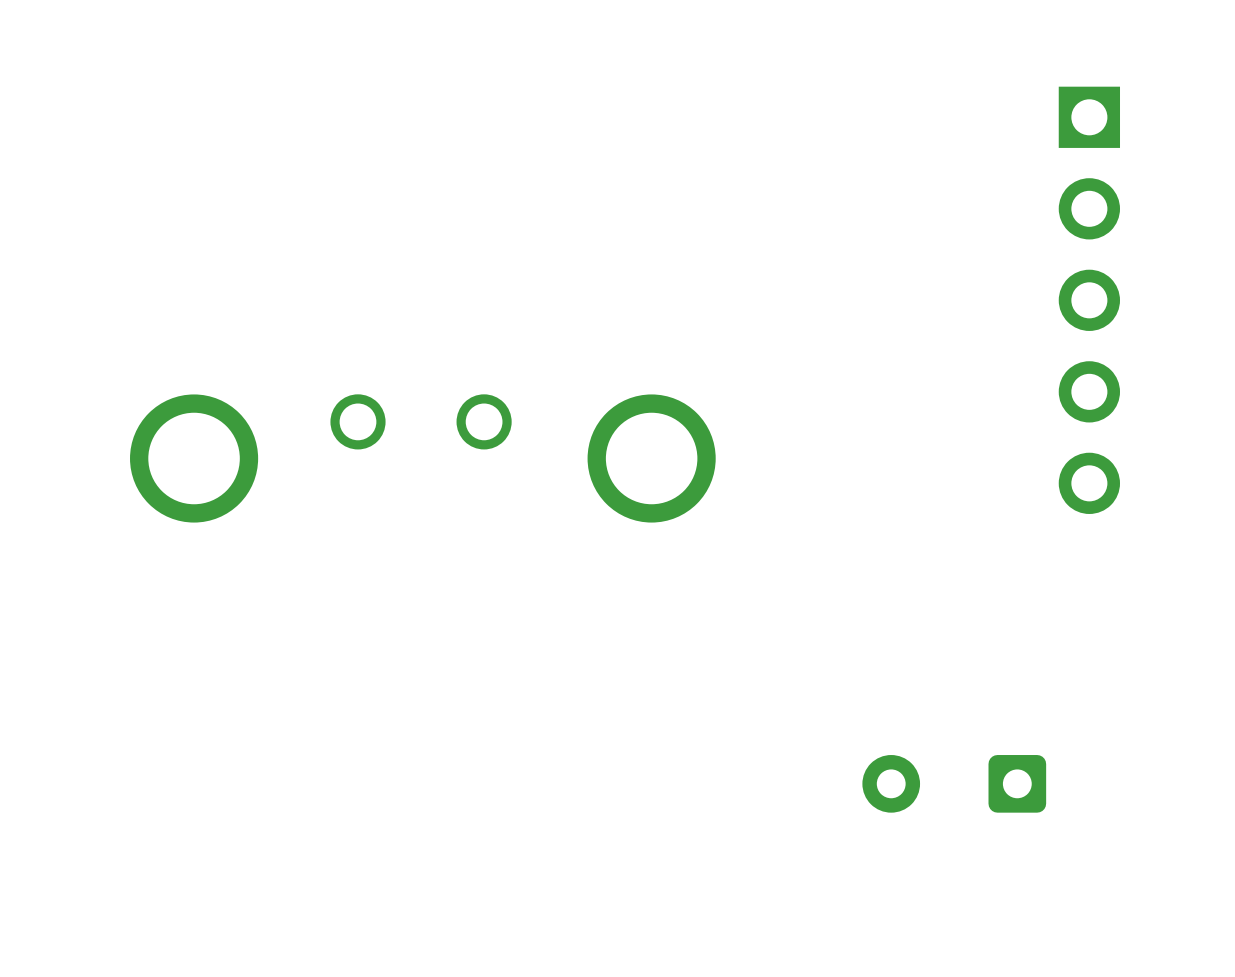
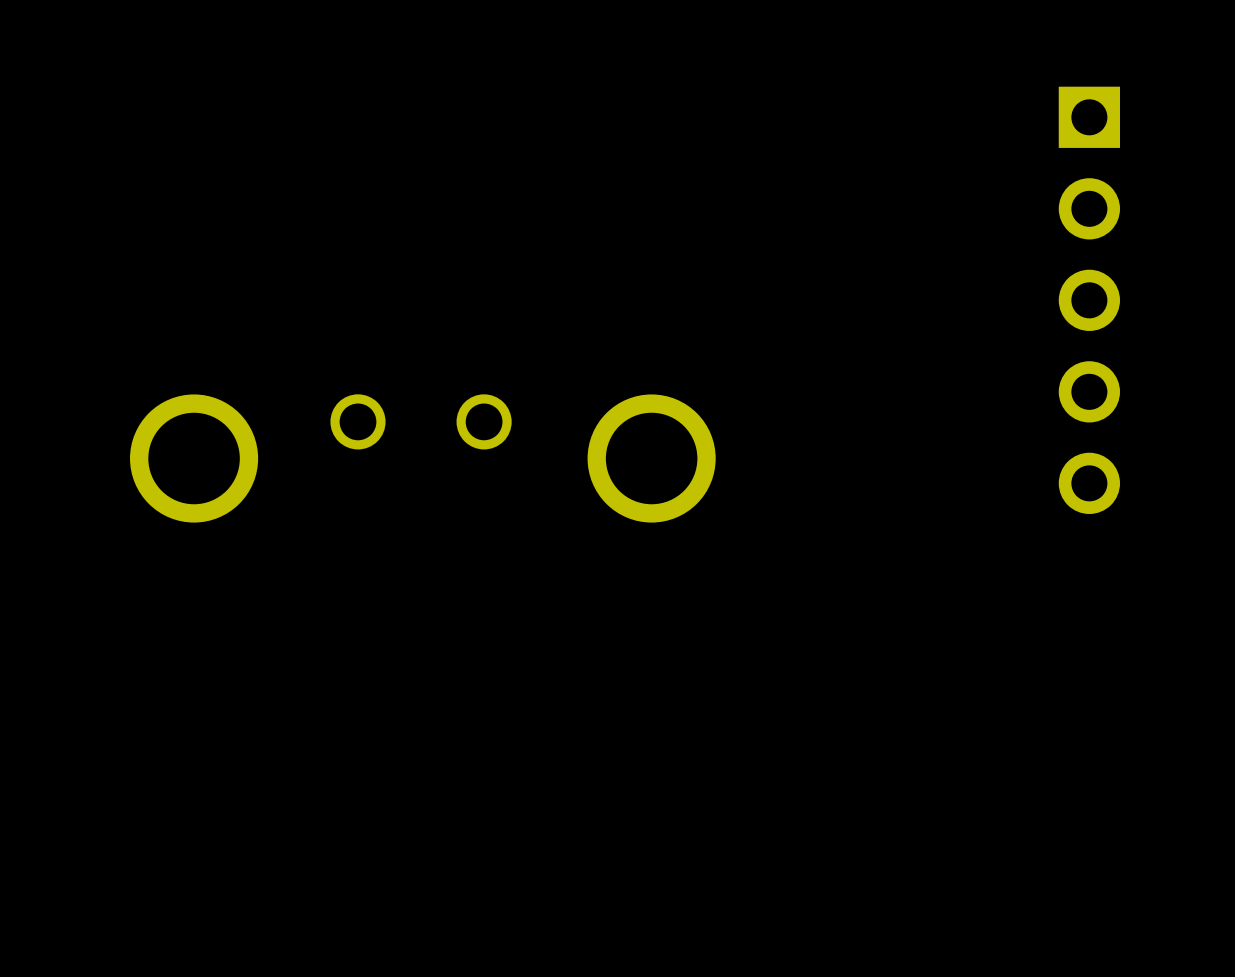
part: (954, 783) -> none

